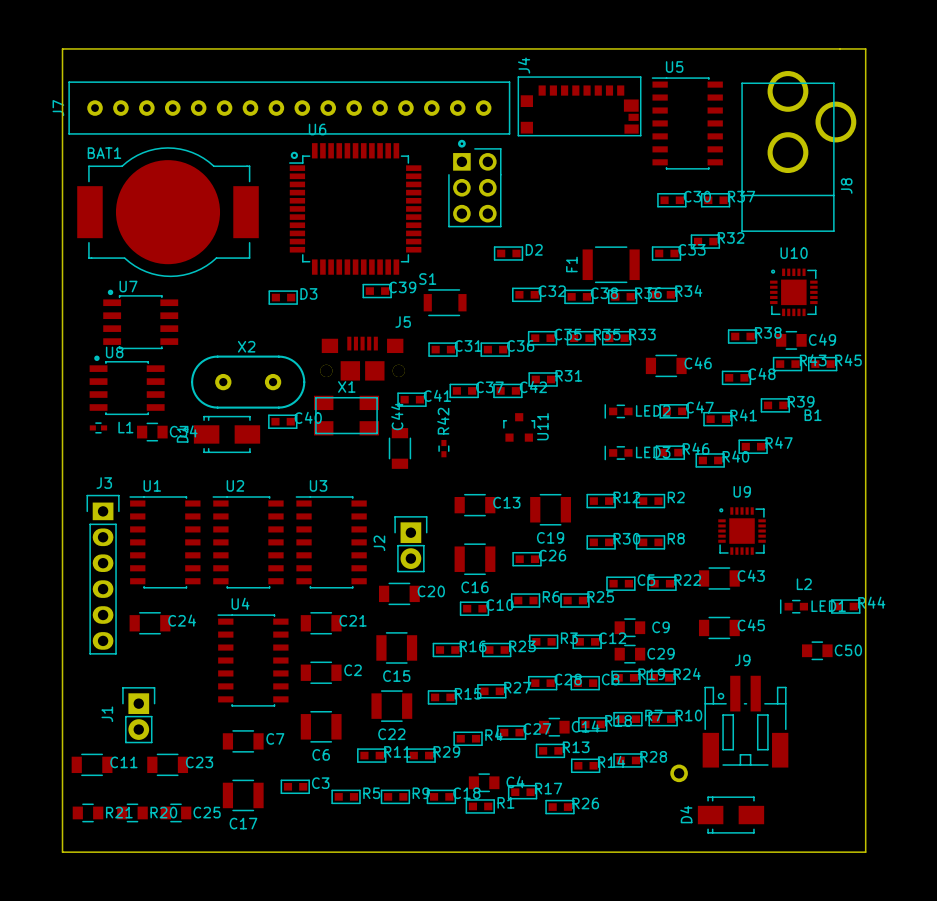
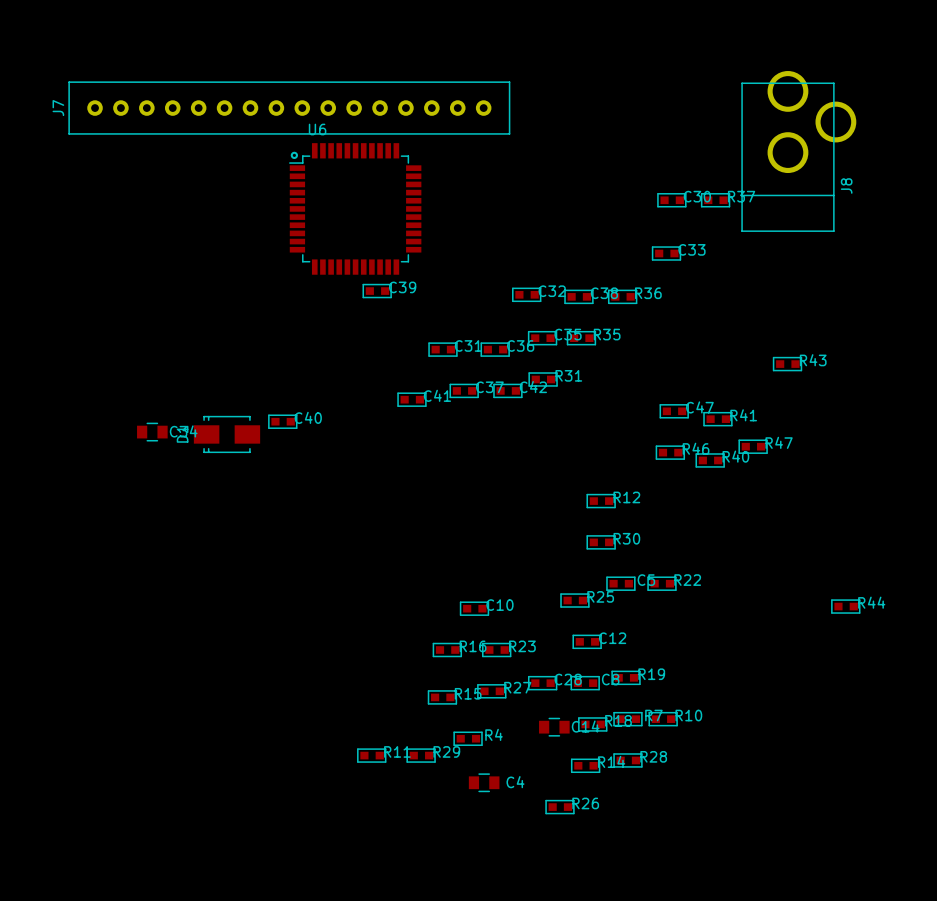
board edge: (62, 48) (865, 48) (865, 852) (62, 852) (62, 48) -> none
J4: (579, 106) -> none
U5: (687, 123) -> none
part: (474, 183) -> none
BAT1: (168, 212) -> none
R32: (705, 241) -> none
D2: (508, 253) -> none
F1: (611, 264) -> none
U10: (793, 292) -> none
R34: (662, 294) -> none
D3: (283, 297) -> none
S1: (461, 312) -> none
U7: (140, 319) -> none
R38: (742, 336) -> none
R33: (616, 338) -> none
C49: (791, 340) -> none
J5: (362, 358) -> none
R45: (822, 364) -> none
C46: (666, 365) -> none
C48: (736, 377) -> none
X2: (248, 382) -> none
U8: (127, 385) -> none
R39: (775, 405) -> none
LED2: (618, 411) -> none
X1: (346, 415) -> none
B1: (813, 415) -> none
L1: (98, 427) -> none
U11: (519, 427) -> none
C44: (399, 448) -> none
R42: (443, 448) -> none
LED3: (618, 452) -> none
R2: (650, 501) -> none
C13: (474, 505) -> none
C19: (550, 509) -> none
U9: (742, 531) -> none
U1: (164, 542) -> none
U2: (248, 542) -> none
U3: (331, 542) -> none
R8: (650, 542) -> none
J2: (410, 544) -> none
C16: (474, 559) -> none
C26: (527, 559) -> none
J3: (103, 574) -> none
C43: (719, 578) -> none
L2: (804, 584) -> none
C20: (399, 593) -> none
R6: (525, 600) -> none
LED1: (794, 606) -> none
C24: (149, 623) -> none
C21: (321, 623) -> none
C9: (629, 627) -> none
C45: (719, 627) -> none
R3: (543, 641) -> none
C15: (396, 647) -> none
C50: (817, 650) -> none
C29: (629, 654) -> none
U4: (252, 660) -> none
C2: (321, 672) -> none
R24: (661, 677) -> none
C22: (391, 706) -> none
J1: (138, 715) -> none
J9: (745, 721) -> none
C6: (321, 726) -> none
C27: (511, 732) -> none
C7: (243, 741) -> none
R13: (550, 750) -> none
C11: (92, 764) -> none
C23: (167, 764) -> none
part: (679, 773) -> none
C3: (295, 786) -> none
R17: (522, 792) -> none
C17: (243, 795) -> none
R5: (346, 796) -> none
R9: (395, 796) -> none
C18: (441, 796) -> none
R1: (480, 806) -> none
R21: (88, 812) -> none
R20: (132, 812) -> none
C25: (175, 812) -> none
D4: (731, 815) -> none

